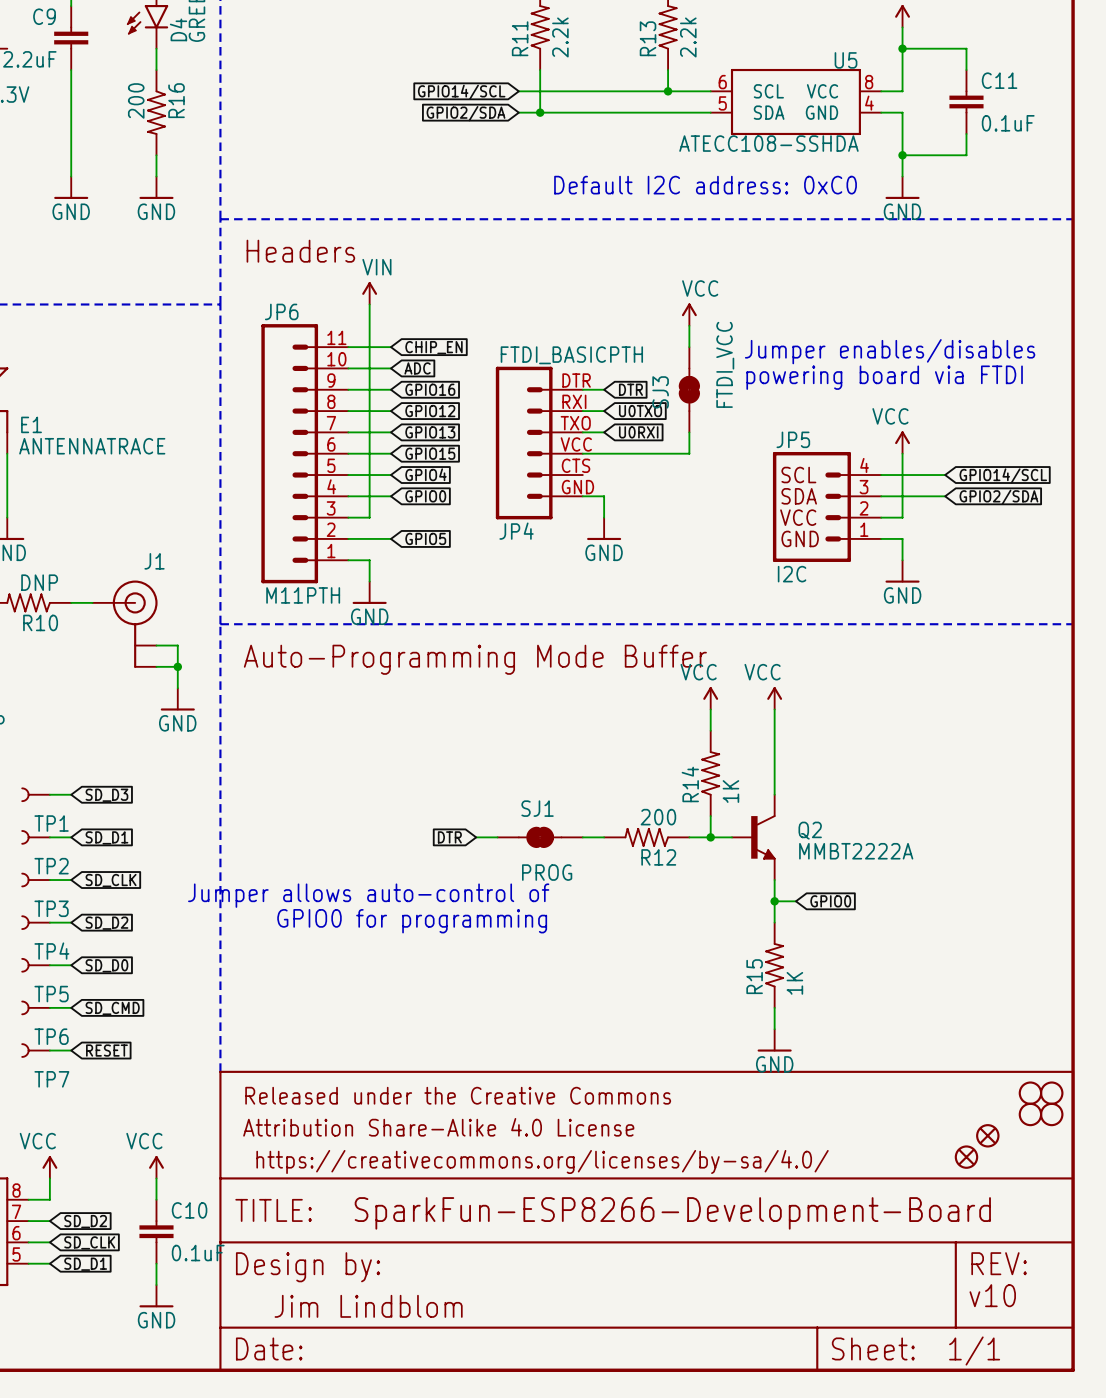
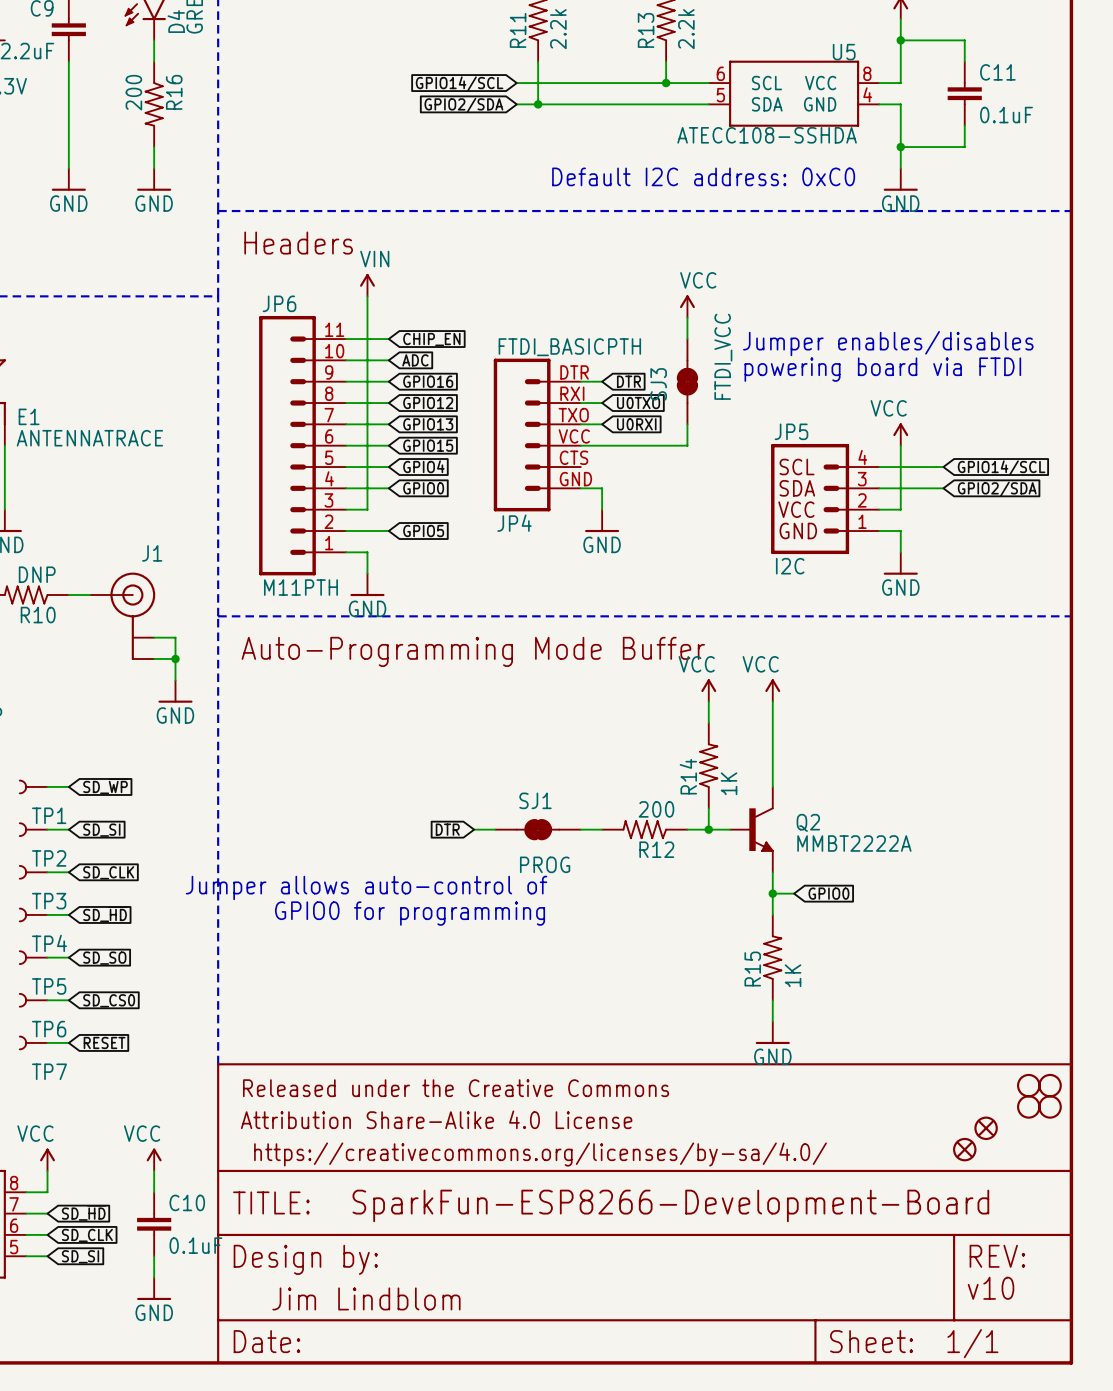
global label: SD_D3 (106, 795) -> SD_~{WP} (105, 786)
global label: SD_D1 (106, 837) -> SD_SI (101, 830)
global label: SD_D2 (106, 923) -> SD_~{HD} (105, 914)
global label: SD_D0 (106, 965) -> SD_SO (104, 958)
global label: SD_CMD (112, 1008) -> SD_CS0 (109, 1000)
global label: SD_D2 (85, 1221) -> SD_~{HD} (84, 1212)
global label: SD_D1 (85, 1264) -> SD_SI (80, 1256)

